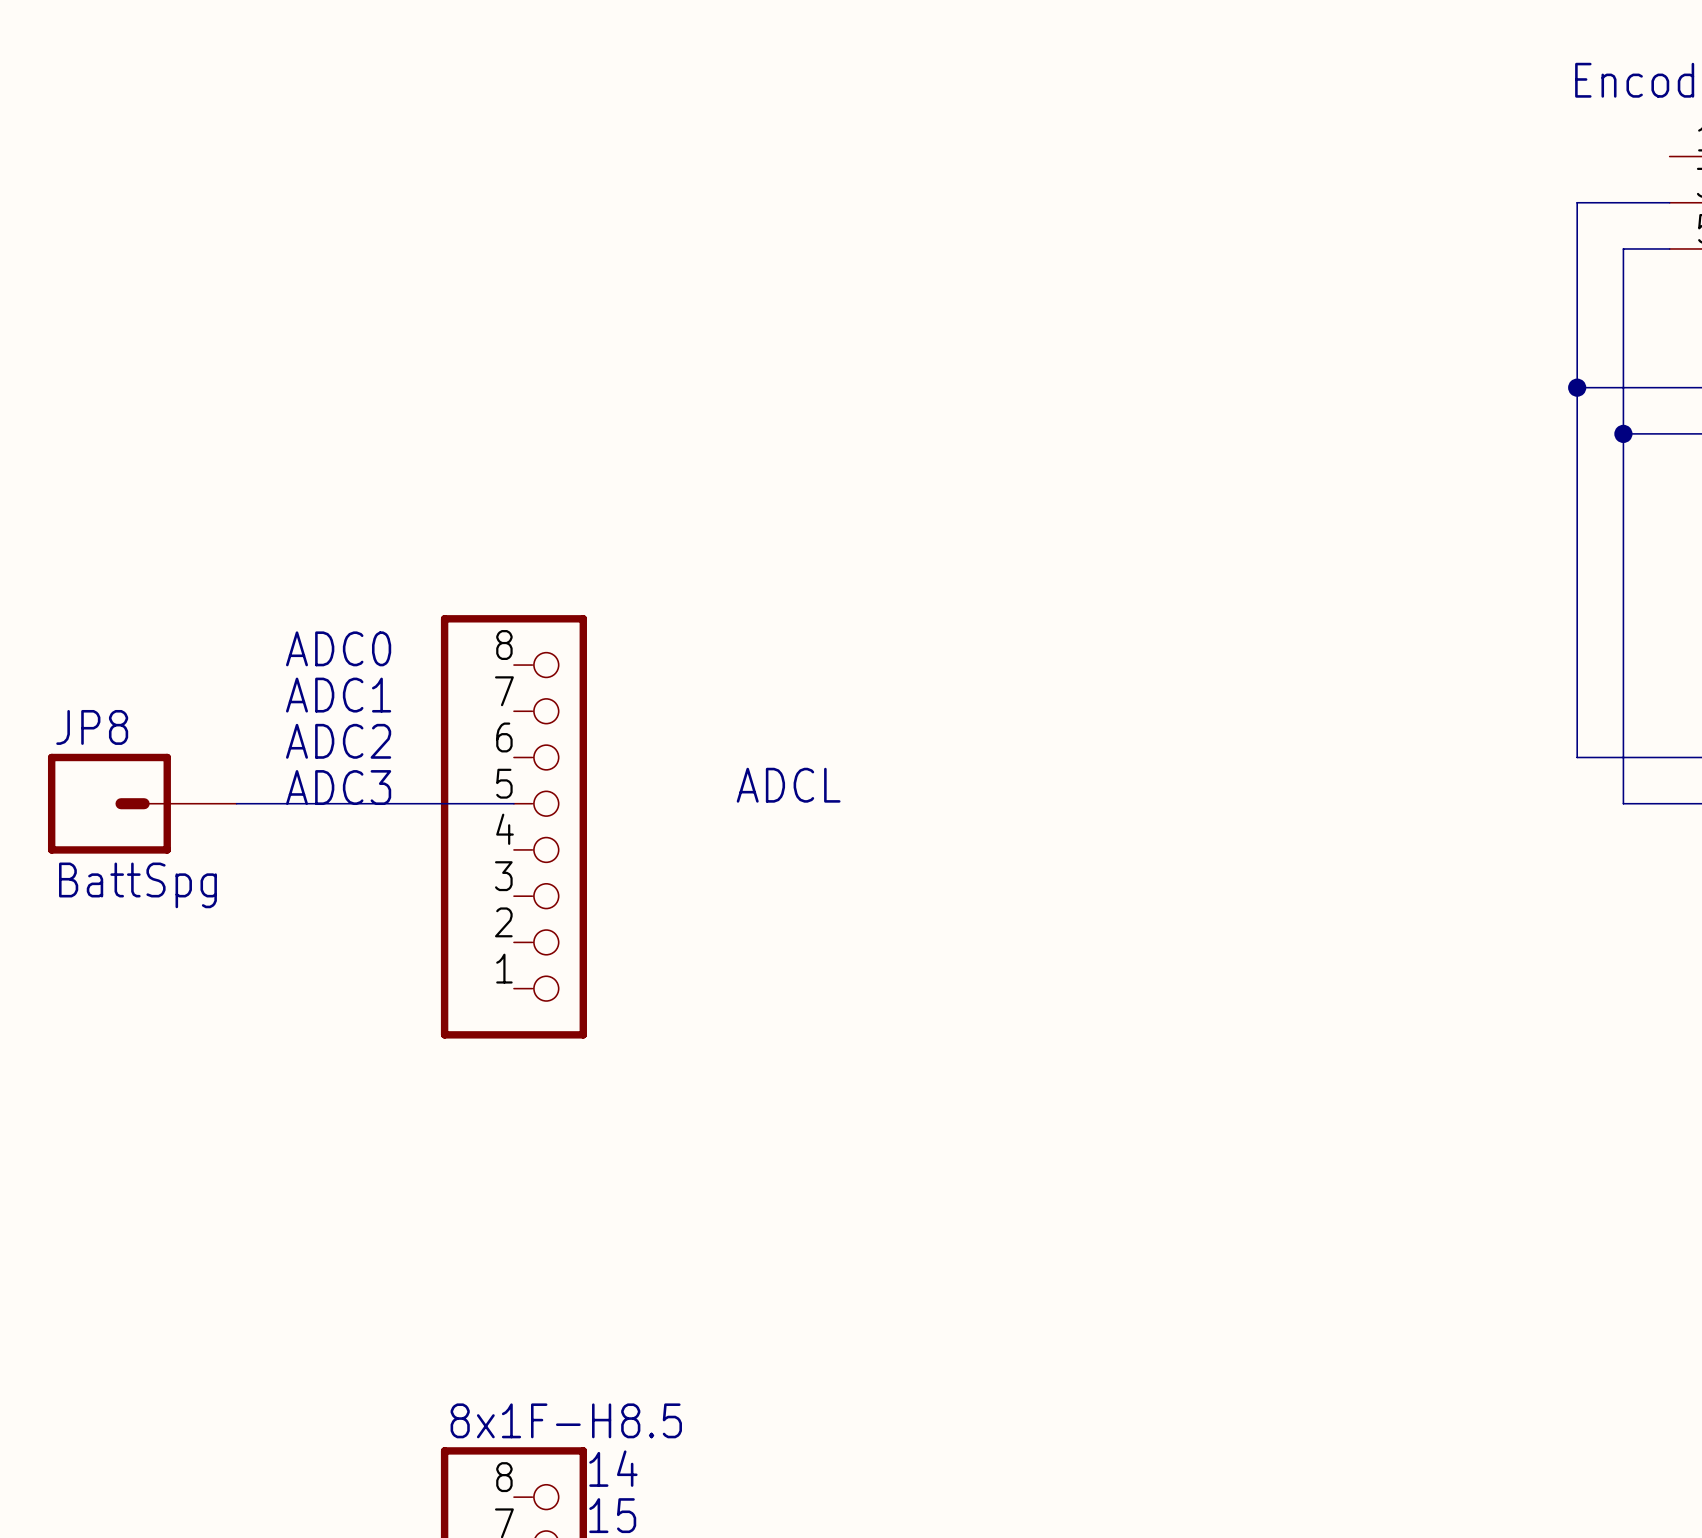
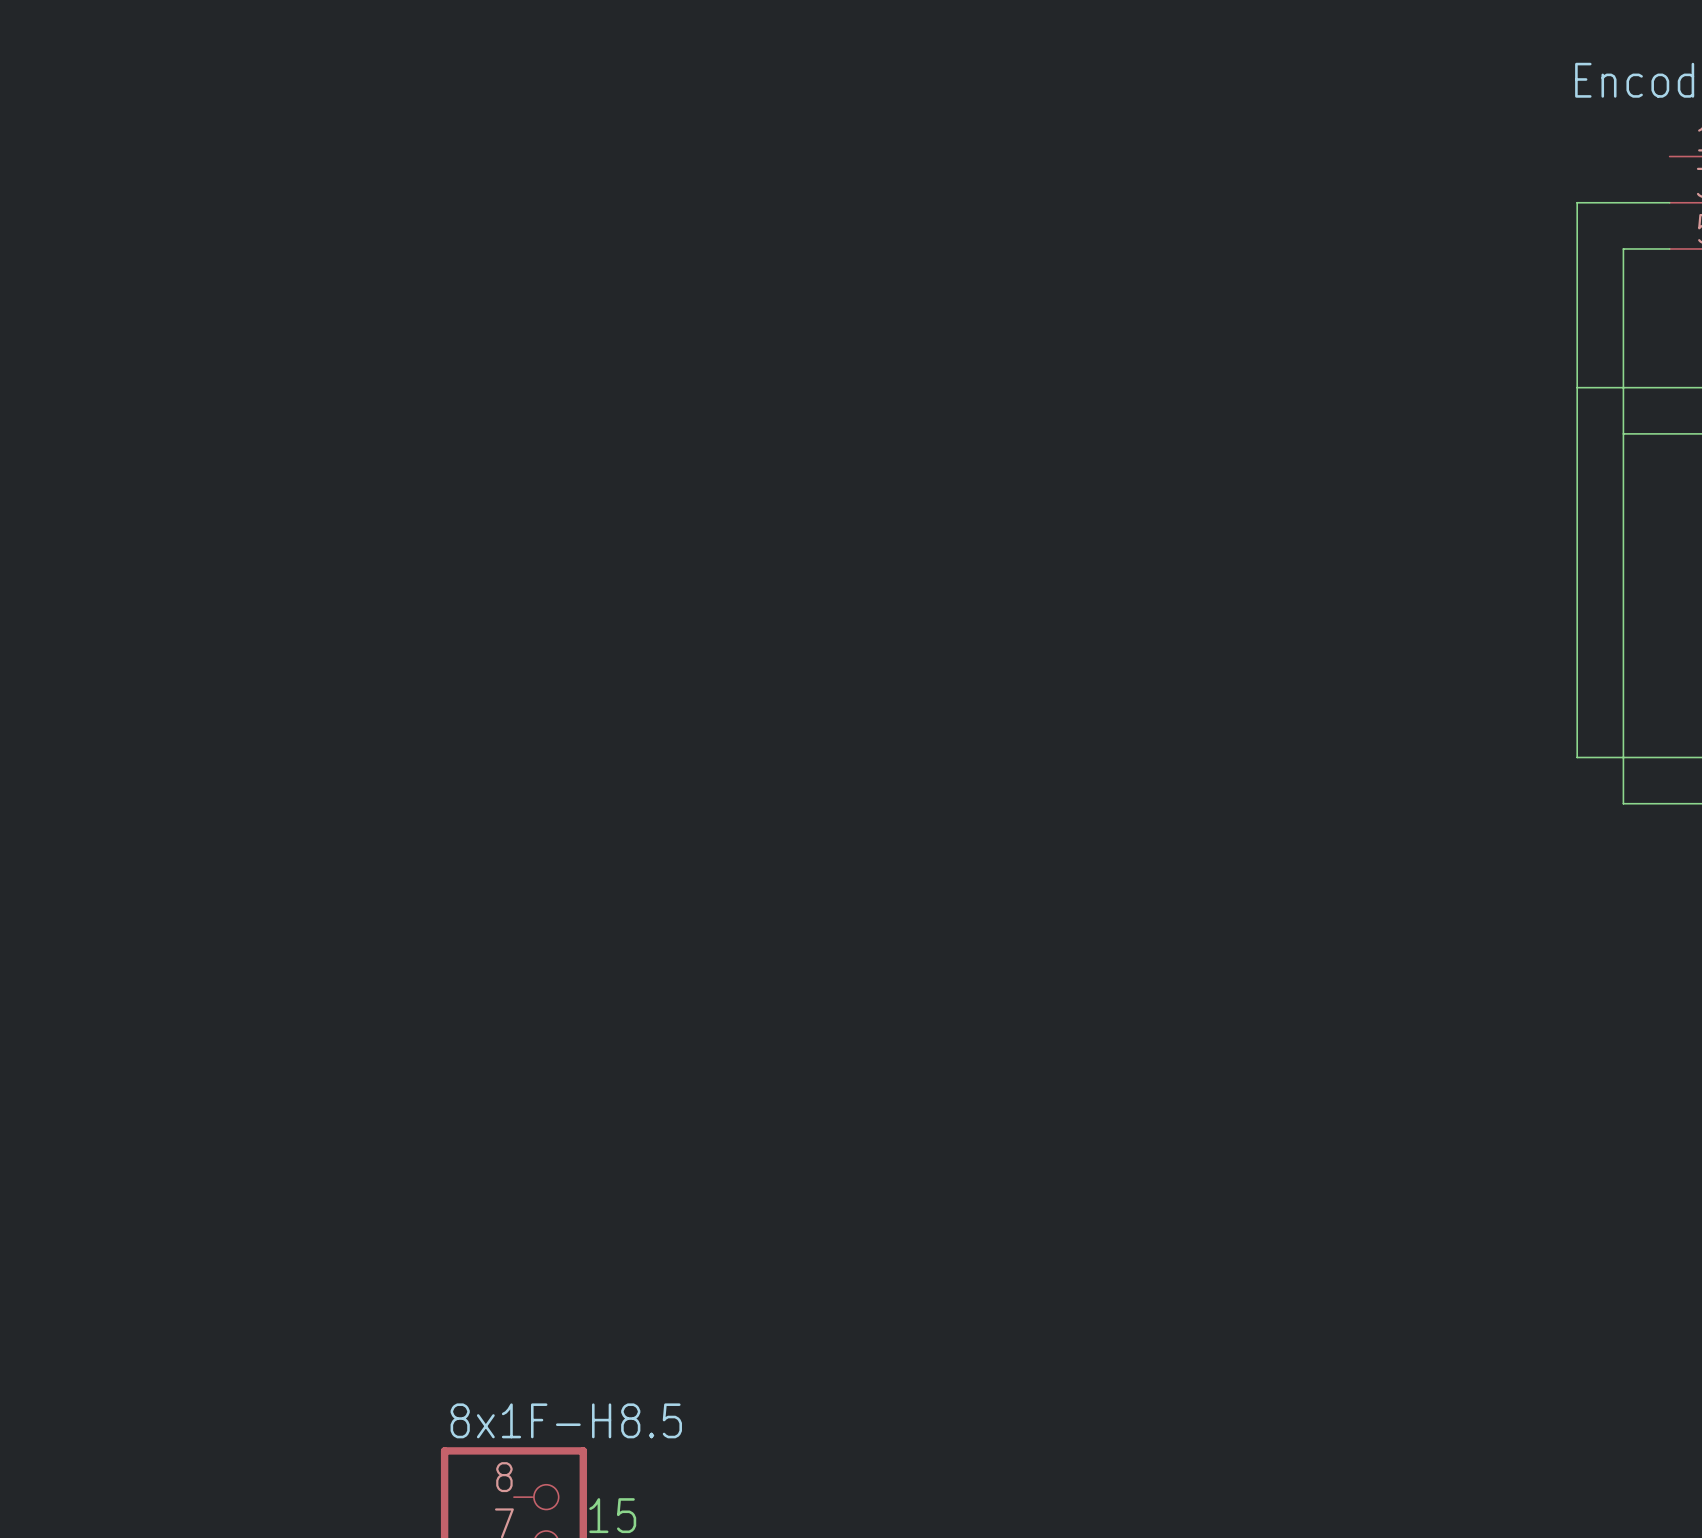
junction: (1577, 387) -> none
junction: (1623, 433) -> none
text: ADC0 (338, 648) -> none
text: ADC1 (338, 695) -> none
text: ADC2 (338, 741) -> none
text: ADC3 (338, 787) -> none
JP8: BattSpg (142, 803) -> none
wire: (236, 803) (513, 803) -> none
ADCL: (513, 826) -> none
text: 14 (613, 1468) -> none

